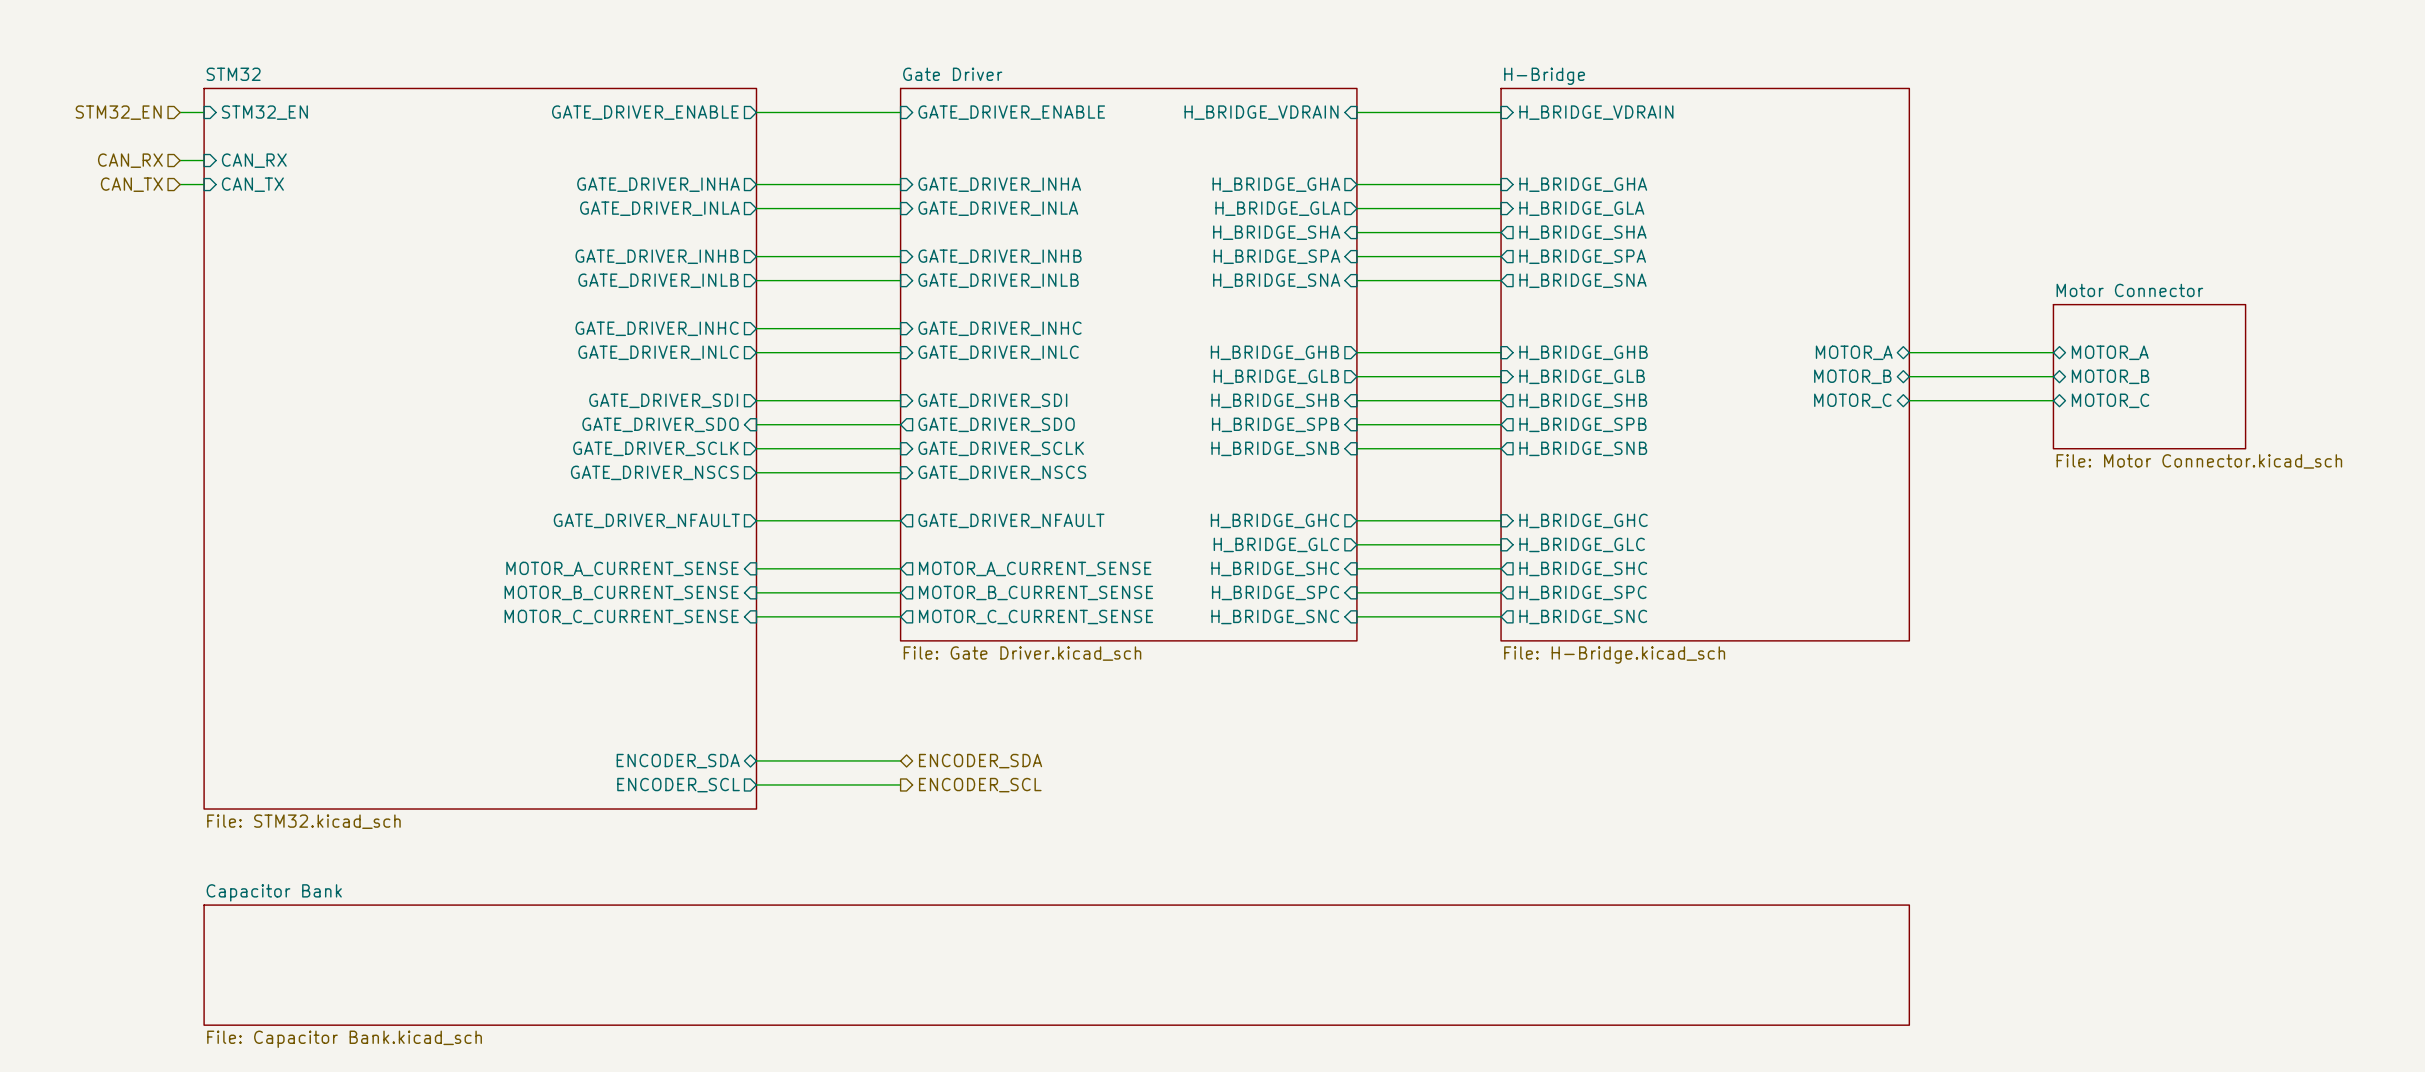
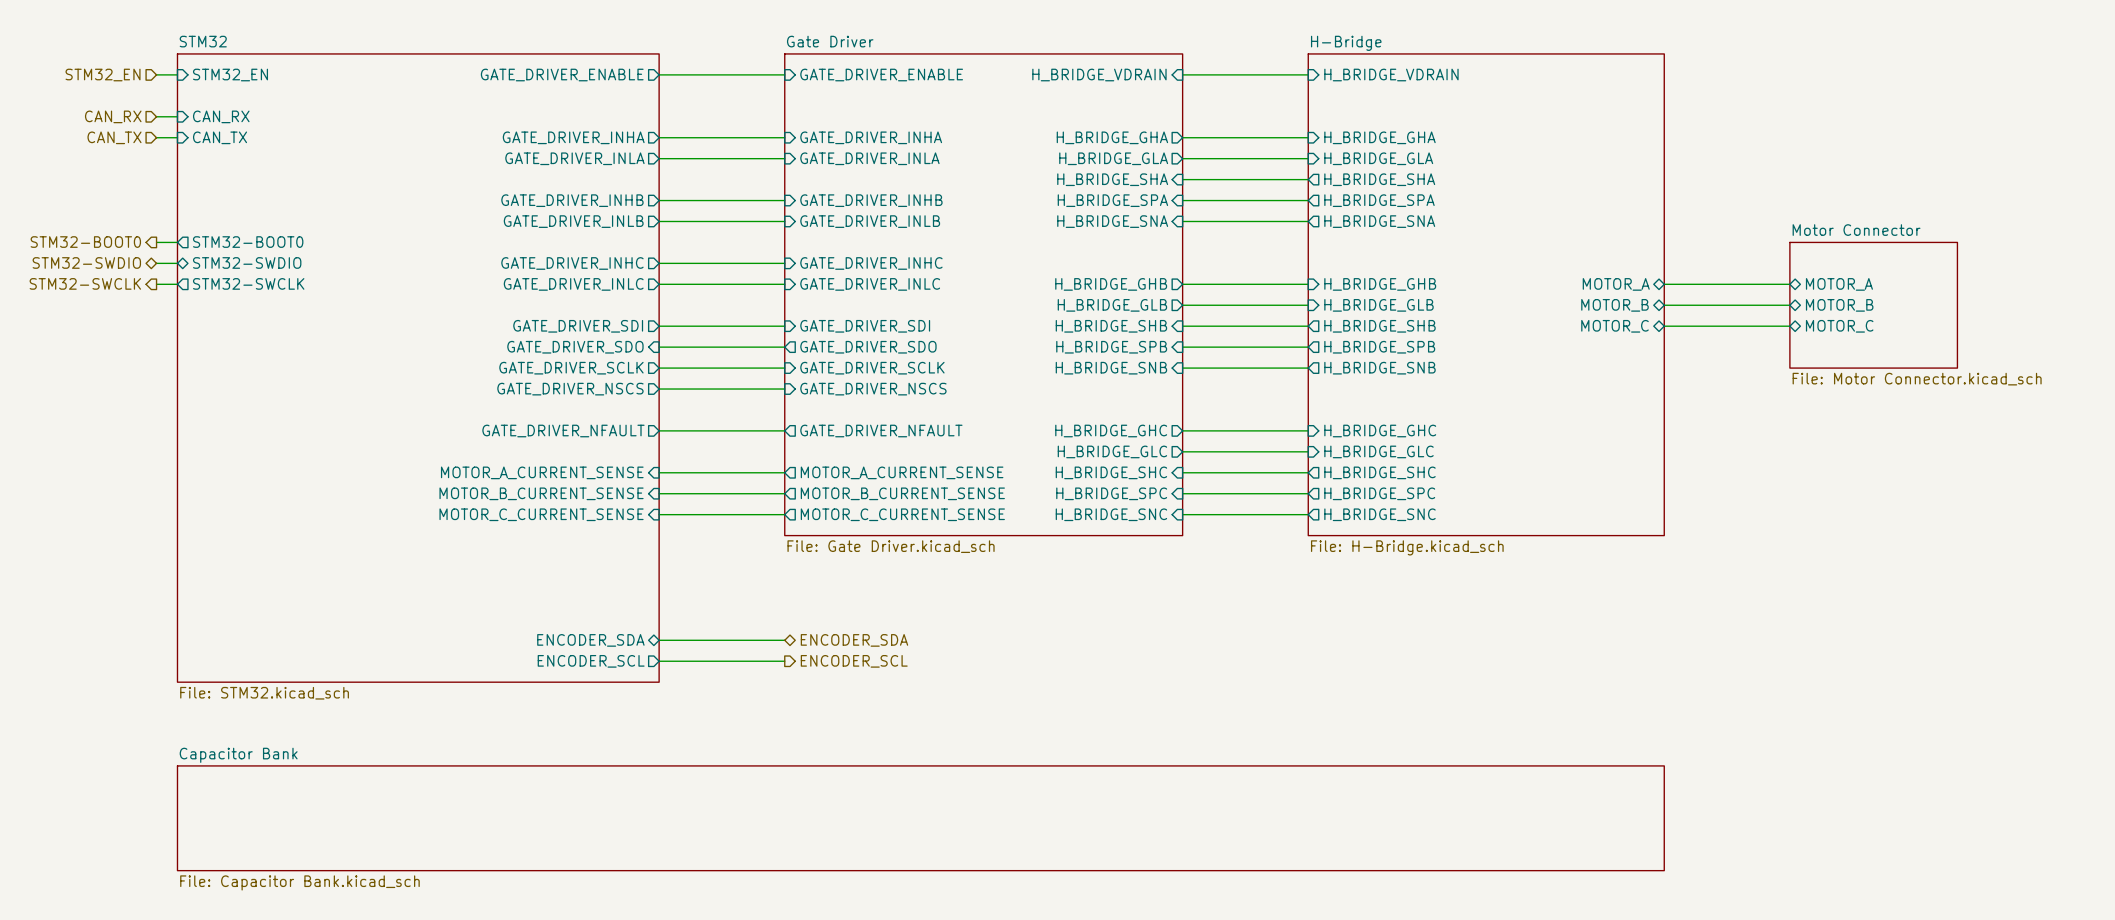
hierarchical label: none -> STM32-BOOT0 (85, 242)
wire: none -> (156, 242) (177, 242)
sheet pin: none -> STM32-BOOT0 (248, 242)
hierarchical label: none -> STM32-SWDIO (86, 262)
wire: none -> (156, 263) (177, 263)
sheet pin: none -> STM32-SWDIO (247, 262)
hierarchical label: none -> STM32-SWCLK (85, 283)
wire: none -> (156, 284) (177, 284)
sheet pin: none -> STM32-SWCLK (248, 283)

